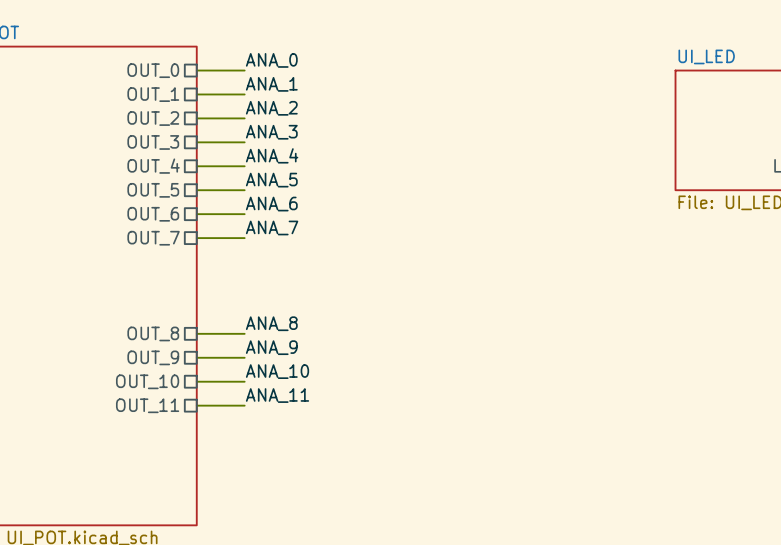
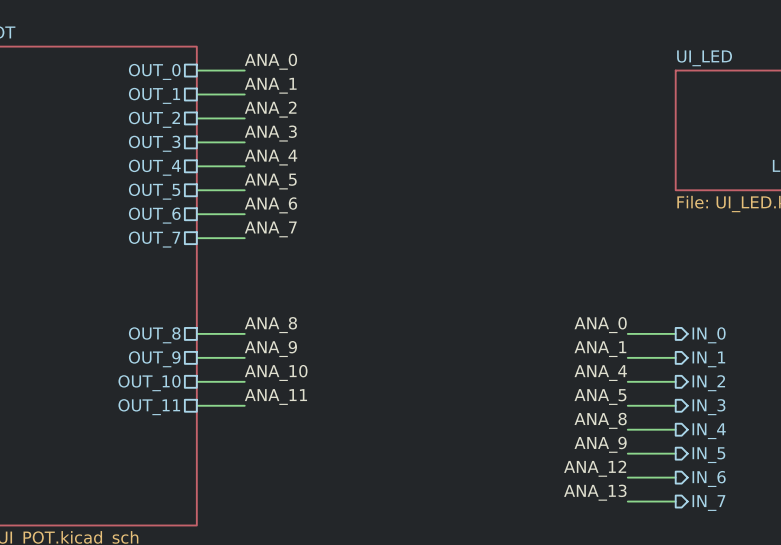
label: none -> ANA_0 (600, 325)
wire: none -> (627, 333) (675, 333)
sheet pin: none -> IN_0 (709, 335)
label: none -> ANA_1 (600, 349)
wire: none -> (627, 357) (675, 357)
sheet pin: none -> IN_1 (708, 359)
label: none -> ANA_4 (600, 373)
wire: none -> (627, 381) (675, 381)
sheet pin: none -> IN_2 (708, 383)
label: none -> ANA_5 (600, 397)
wire: none -> (627, 405) (675, 405)
sheet pin: none -> IN_3 (708, 407)
label: none -> ANA_8 (600, 420)
wire: none -> (627, 429) (675, 429)
sheet pin: none -> IN_4 (709, 431)
label: none -> ANA_9 (600, 444)
wire: none -> (627, 453) (675, 453)
sheet pin: none -> IN_5 (708, 455)
label: none -> ANA_12 (595, 468)
wire: none -> (627, 477) (675, 477)
sheet pin: none -> IN_6 (709, 478)
label: none -> ANA_13 (595, 492)
wire: none -> (627, 501) (675, 501)
sheet pin: none -> IN_7 (708, 503)

